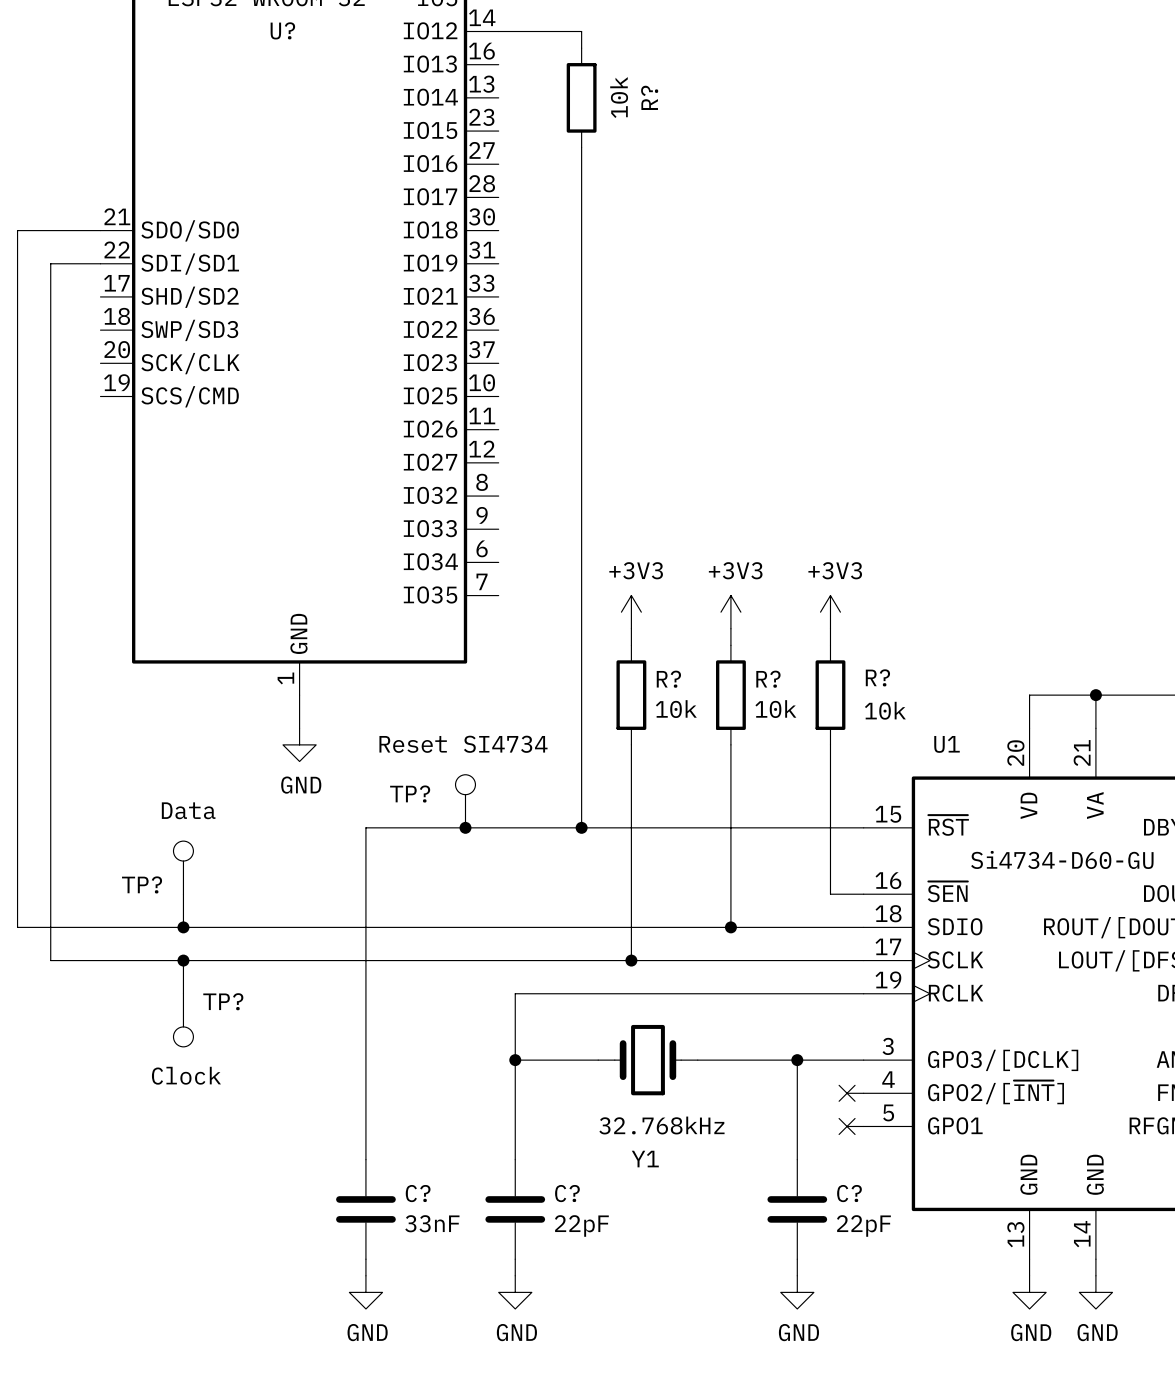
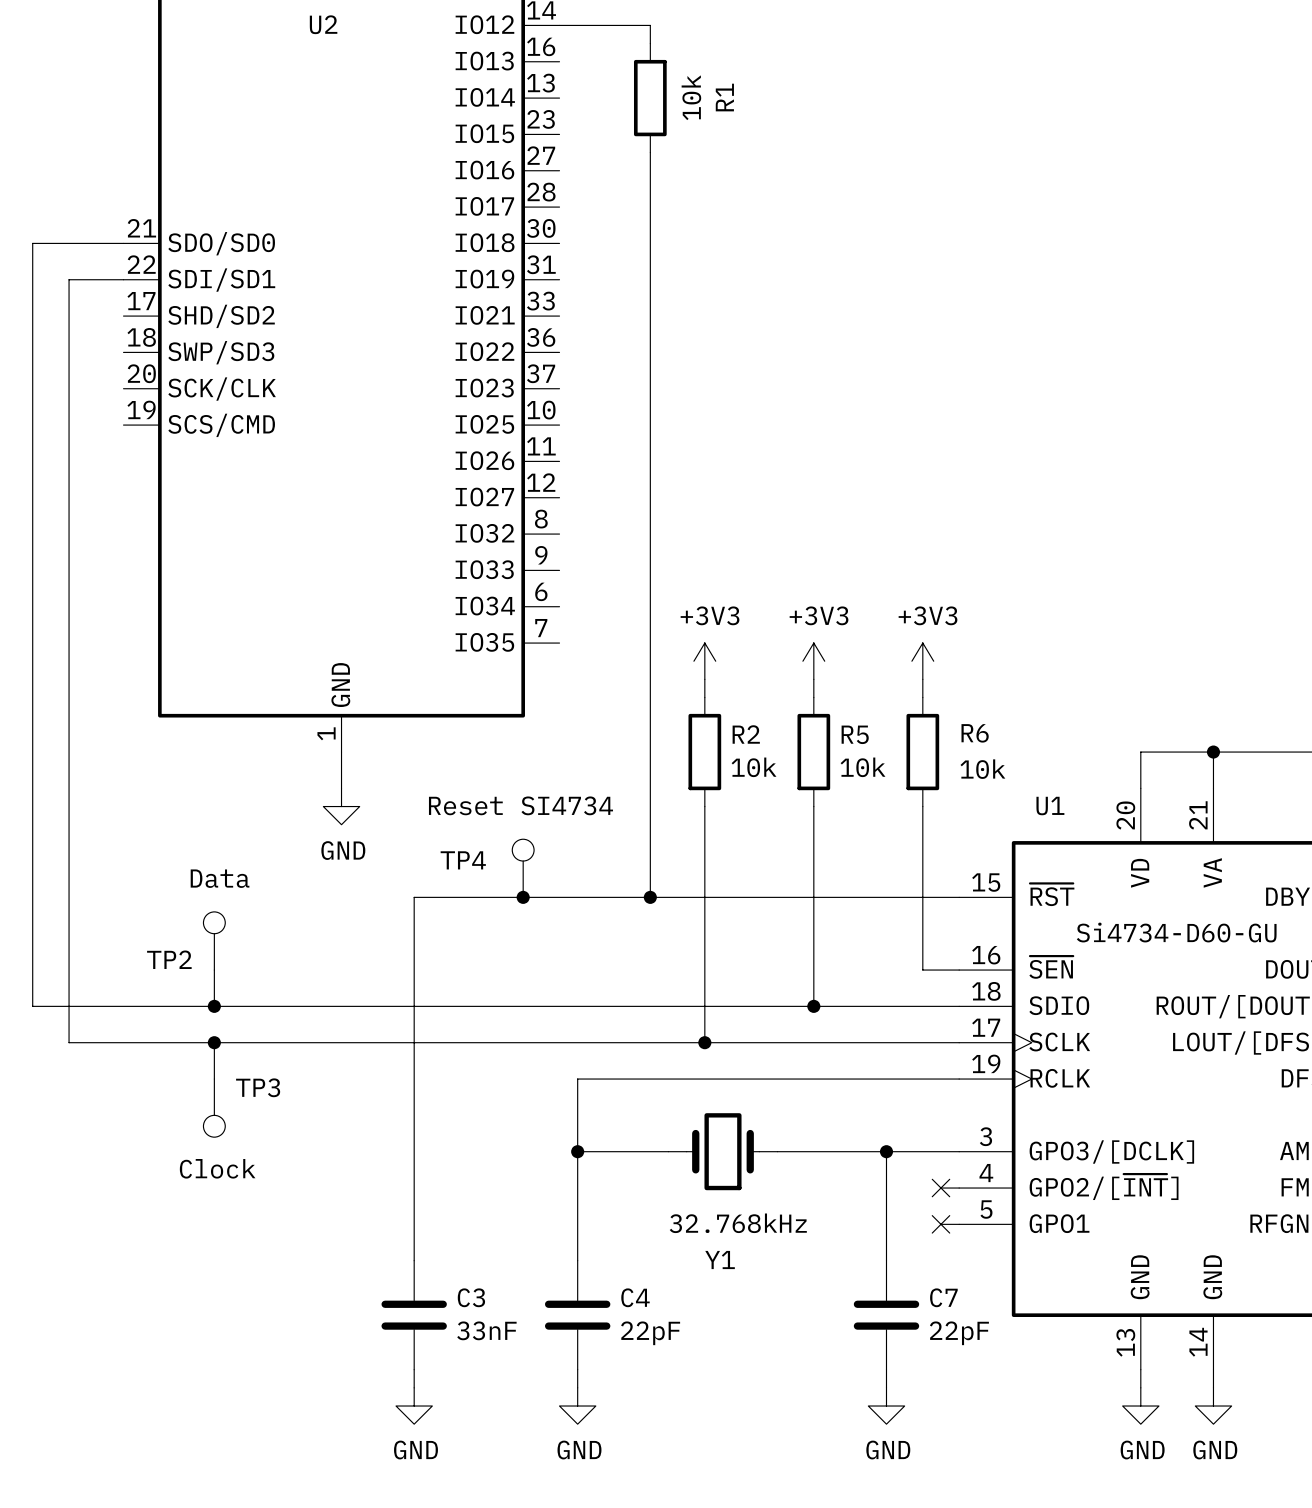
U? name: U? (282, 30) -> U2 (323, 24)
R? name: R? (649, 97) -> R1 (724, 97)
R? name: R? (877, 677) -> R6 (975, 733)
R? name: R? (668, 679) -> R2 (746, 734)
R? name: R? (768, 679) -> R5 (855, 734)
TP? name: TP? (410, 794) -> TP4 (463, 860)
TP? name: TP? (142, 884) -> TP2 (169, 959)
TP? name: TP? (223, 1001) -> TP3 (258, 1087)
C? name: C? (418, 1193) -> C3 (471, 1297)
C? name: C? (567, 1193) -> C4 (635, 1297)
C? name: C? (849, 1193) -> C7 (943, 1297)

